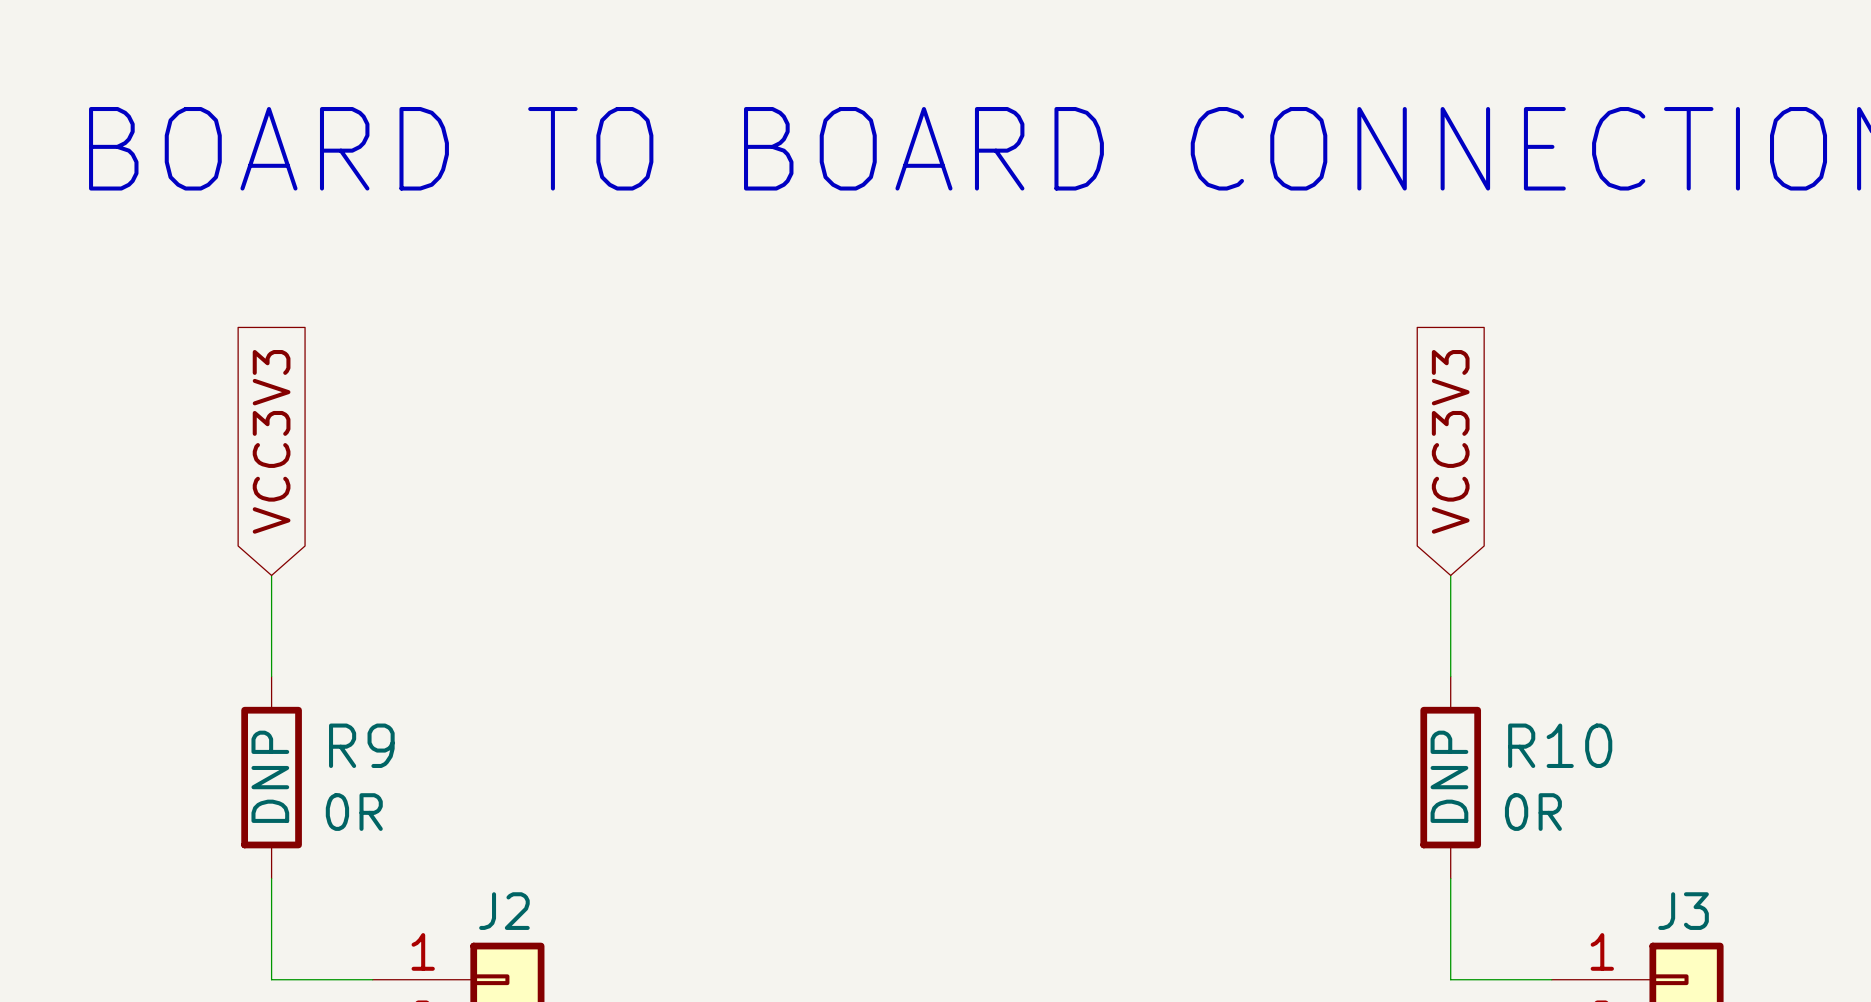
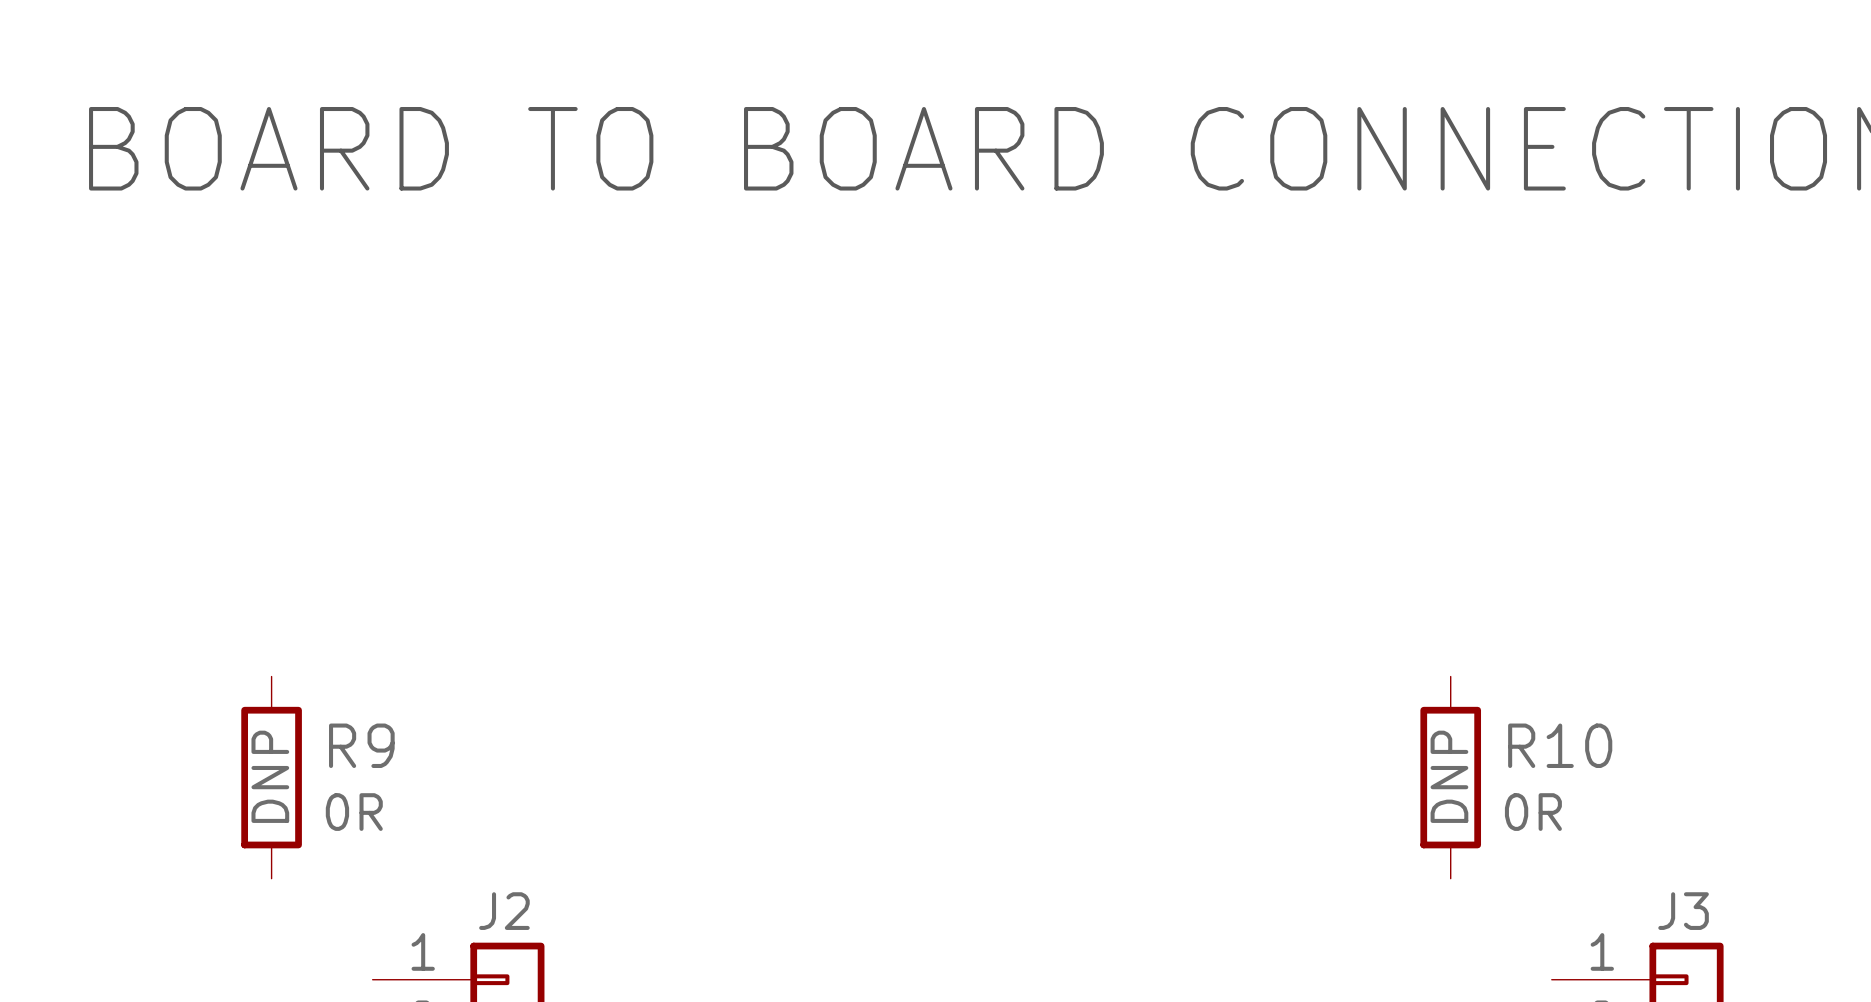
global label: VCC3V3 (271, 441) -> none
global label: VCC3V3 (1450, 441) -> none
wire: (271, 575) (271, 676) -> none
wire: (1450, 575) (1450, 676) -> none
wire: (271, 878) (271, 979) (372, 979) -> none
wire: (1450, 878) (1450, 979) (1551, 979) -> none

